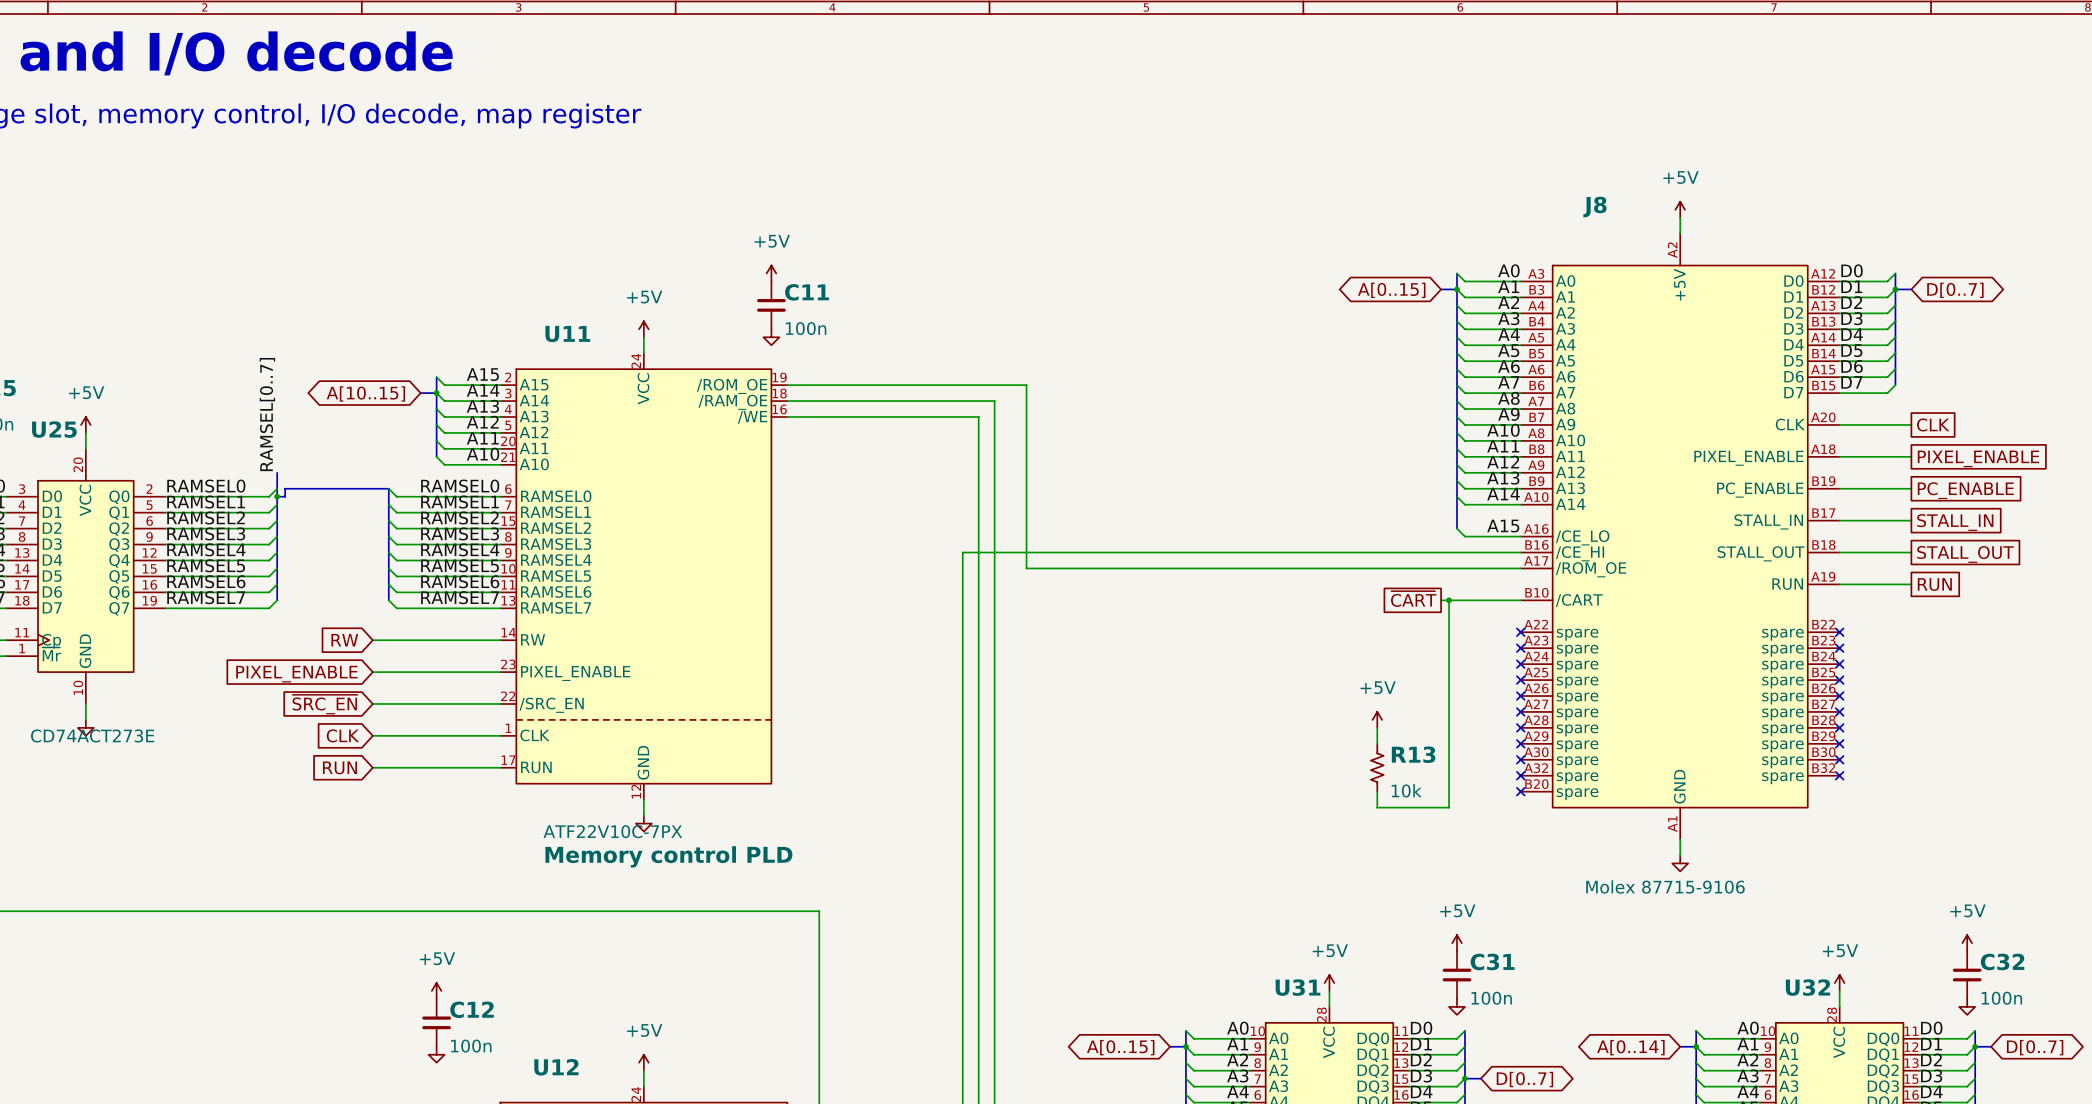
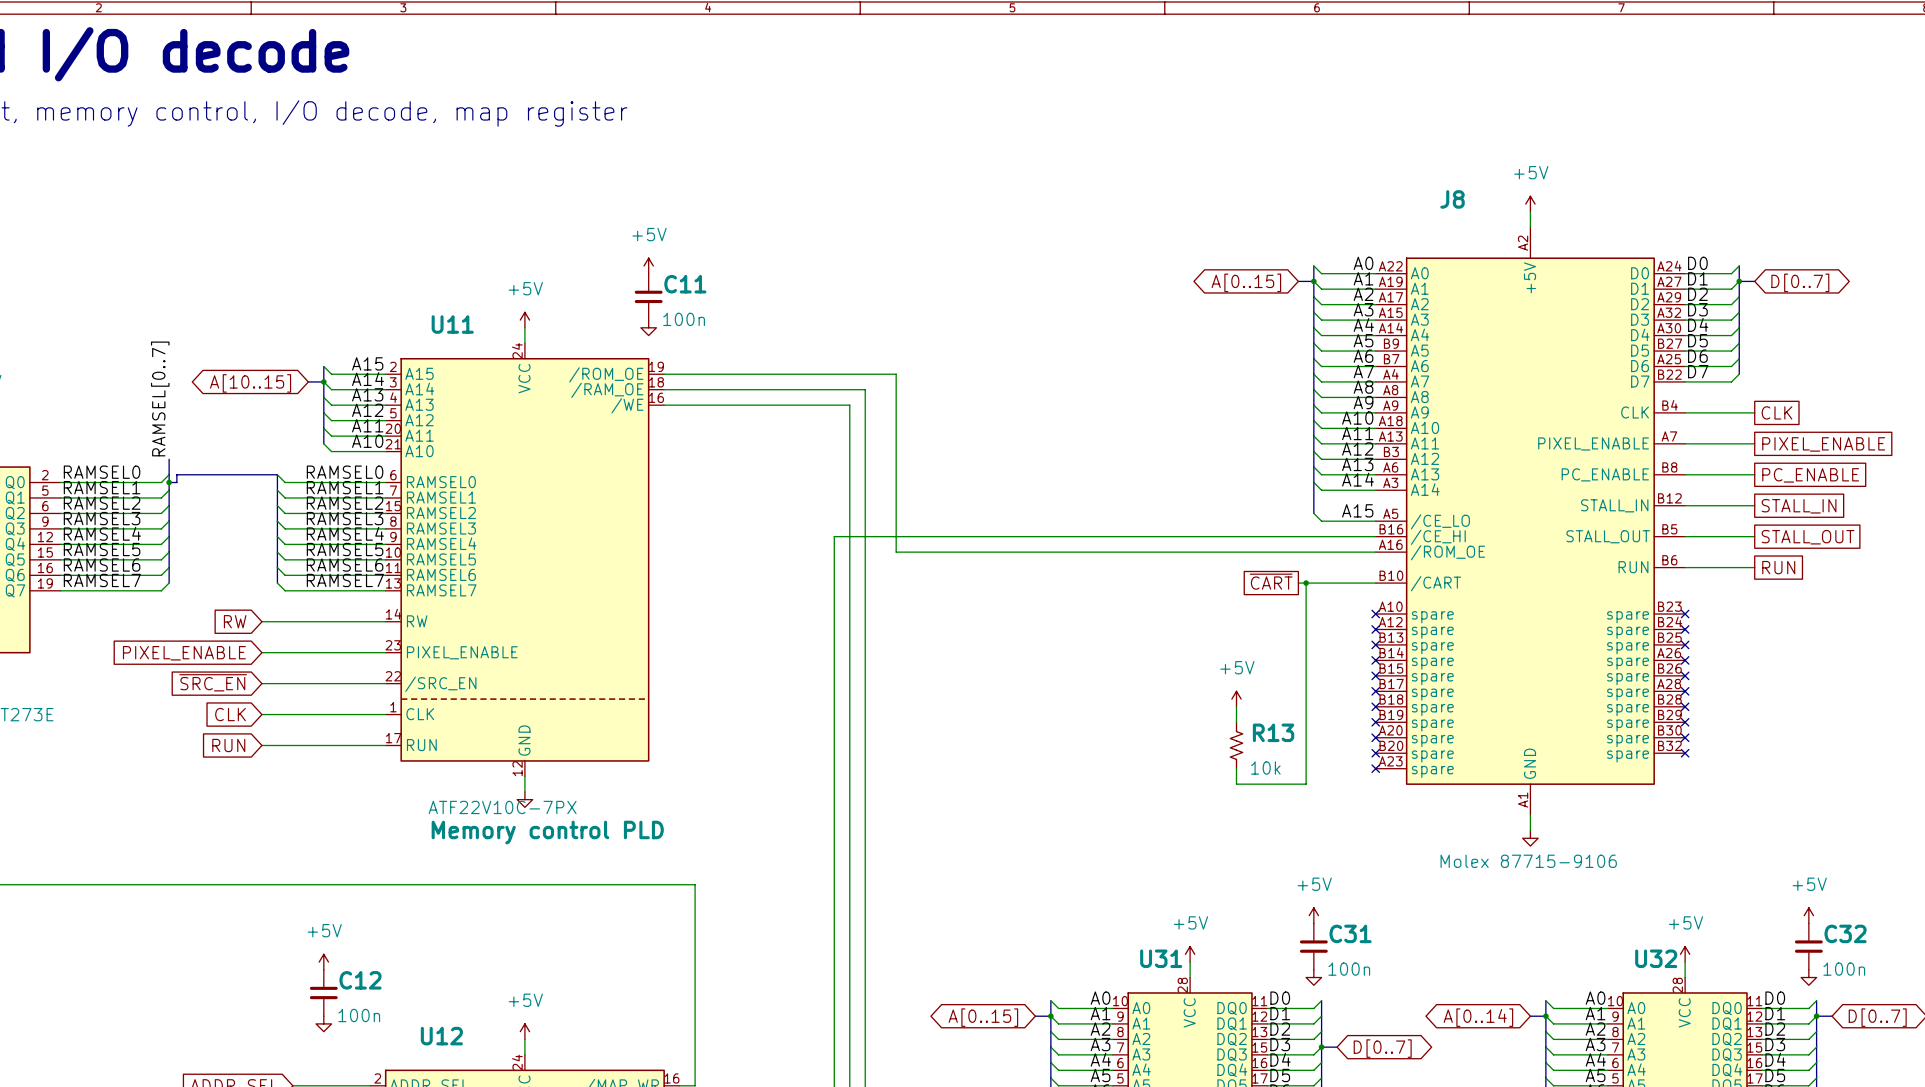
J8 symbol: [1520, 233, 1840, 840] -> [1375, 227, 1686, 816]

